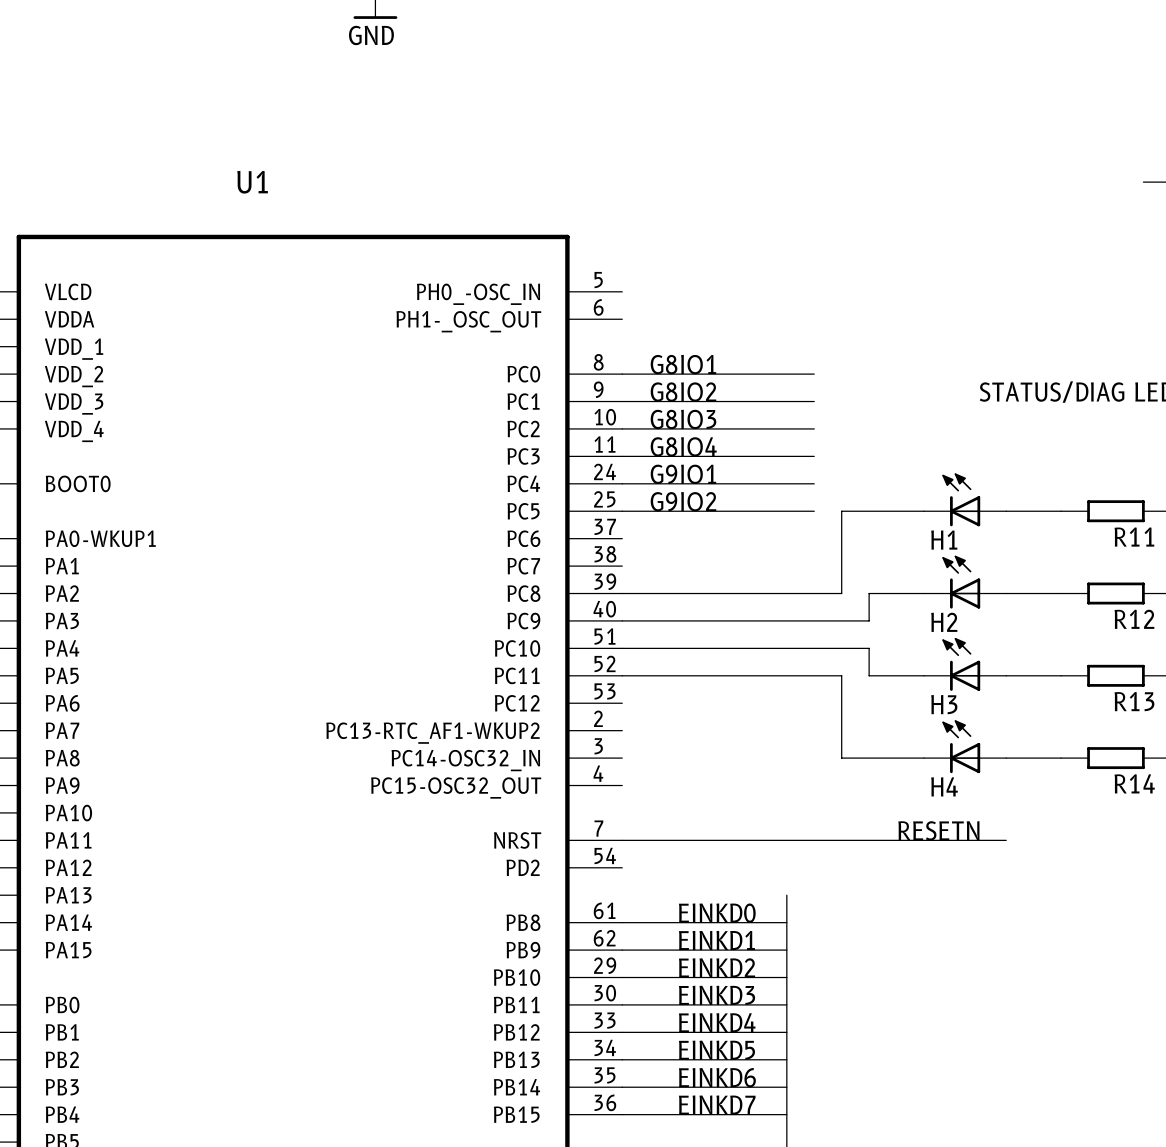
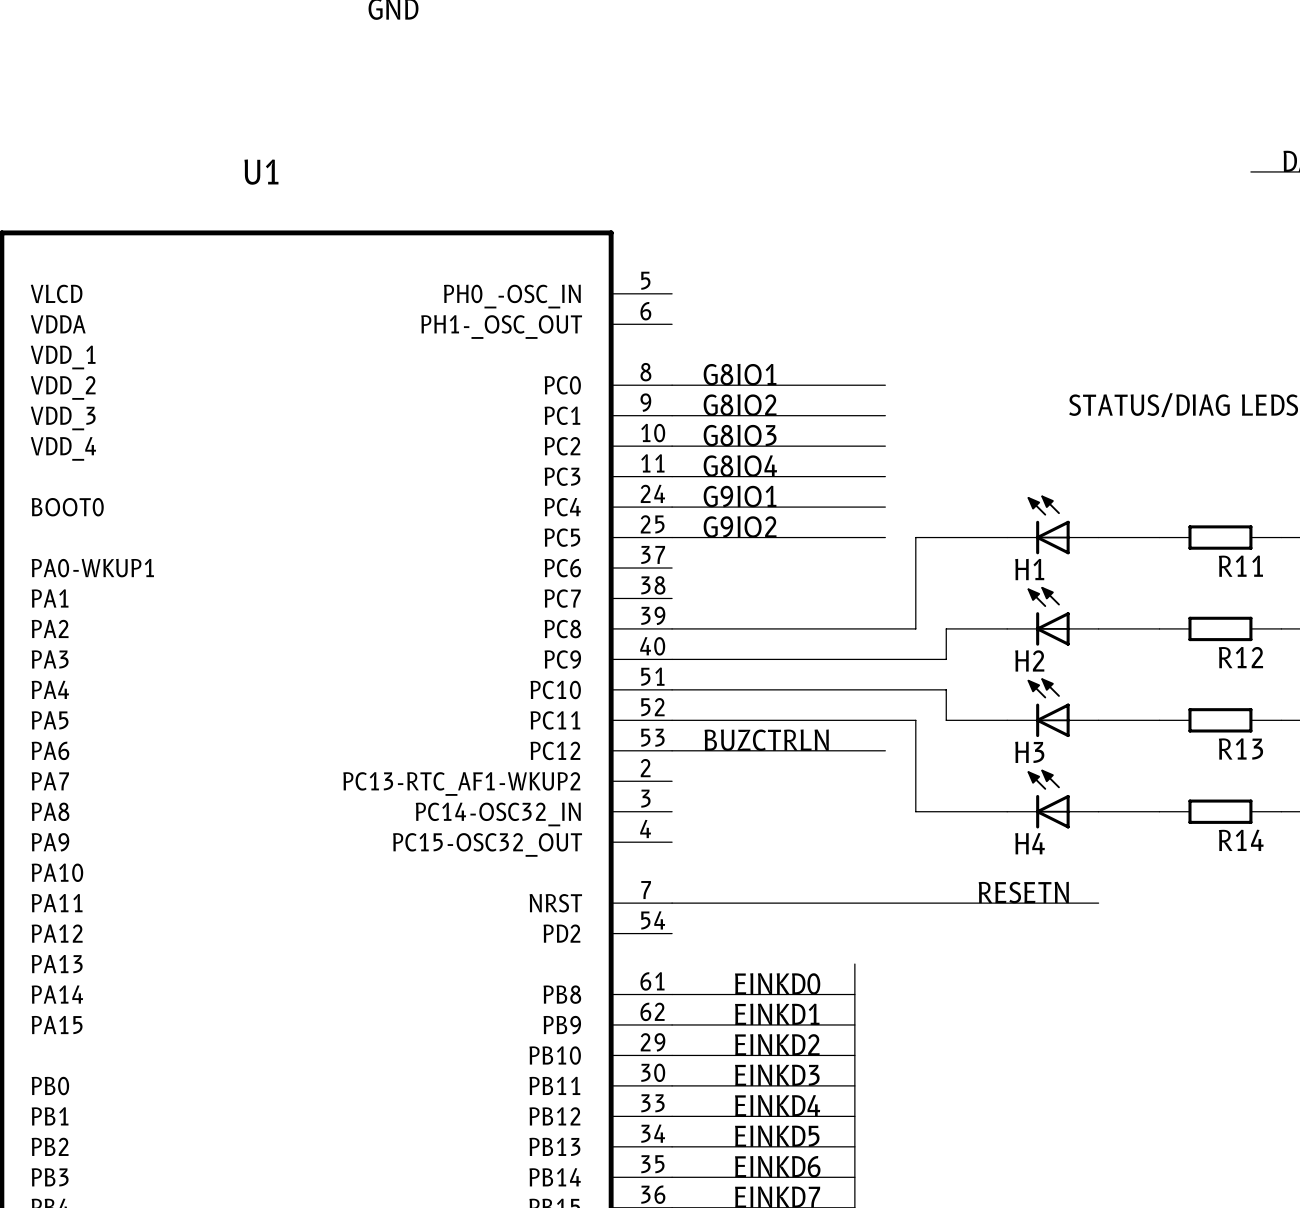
label: none -> BUZCTRLN (766, 740)
wire: none -> (672, 750) (885, 750)

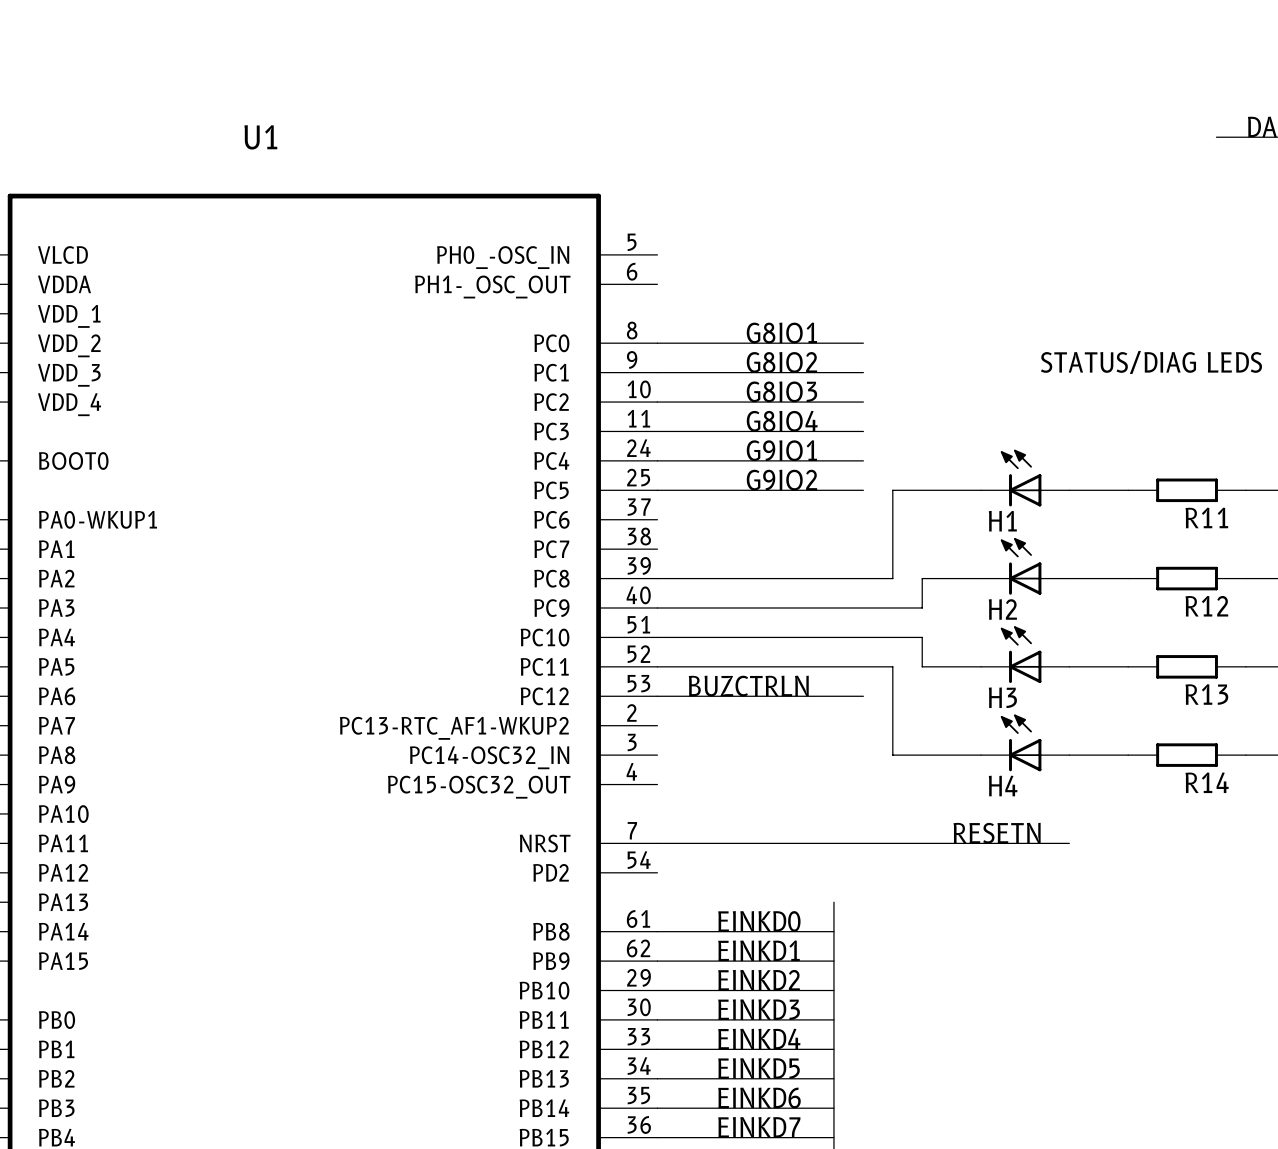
label position: G8IO1 (740, 374) -> G8IO1 (781, 333)
label position: G8IO2 (740, 405) -> G8IO2 (781, 362)
label position: G8IO3 (740, 435) -> G8IO3 (781, 391)
label position: G8IO4 (740, 466) -> G8IO4 (782, 421)
label position: G9IO1 (740, 496) -> G9IO1 (781, 450)
label position: G9IO2 (740, 527) -> G9IO2 (781, 480)

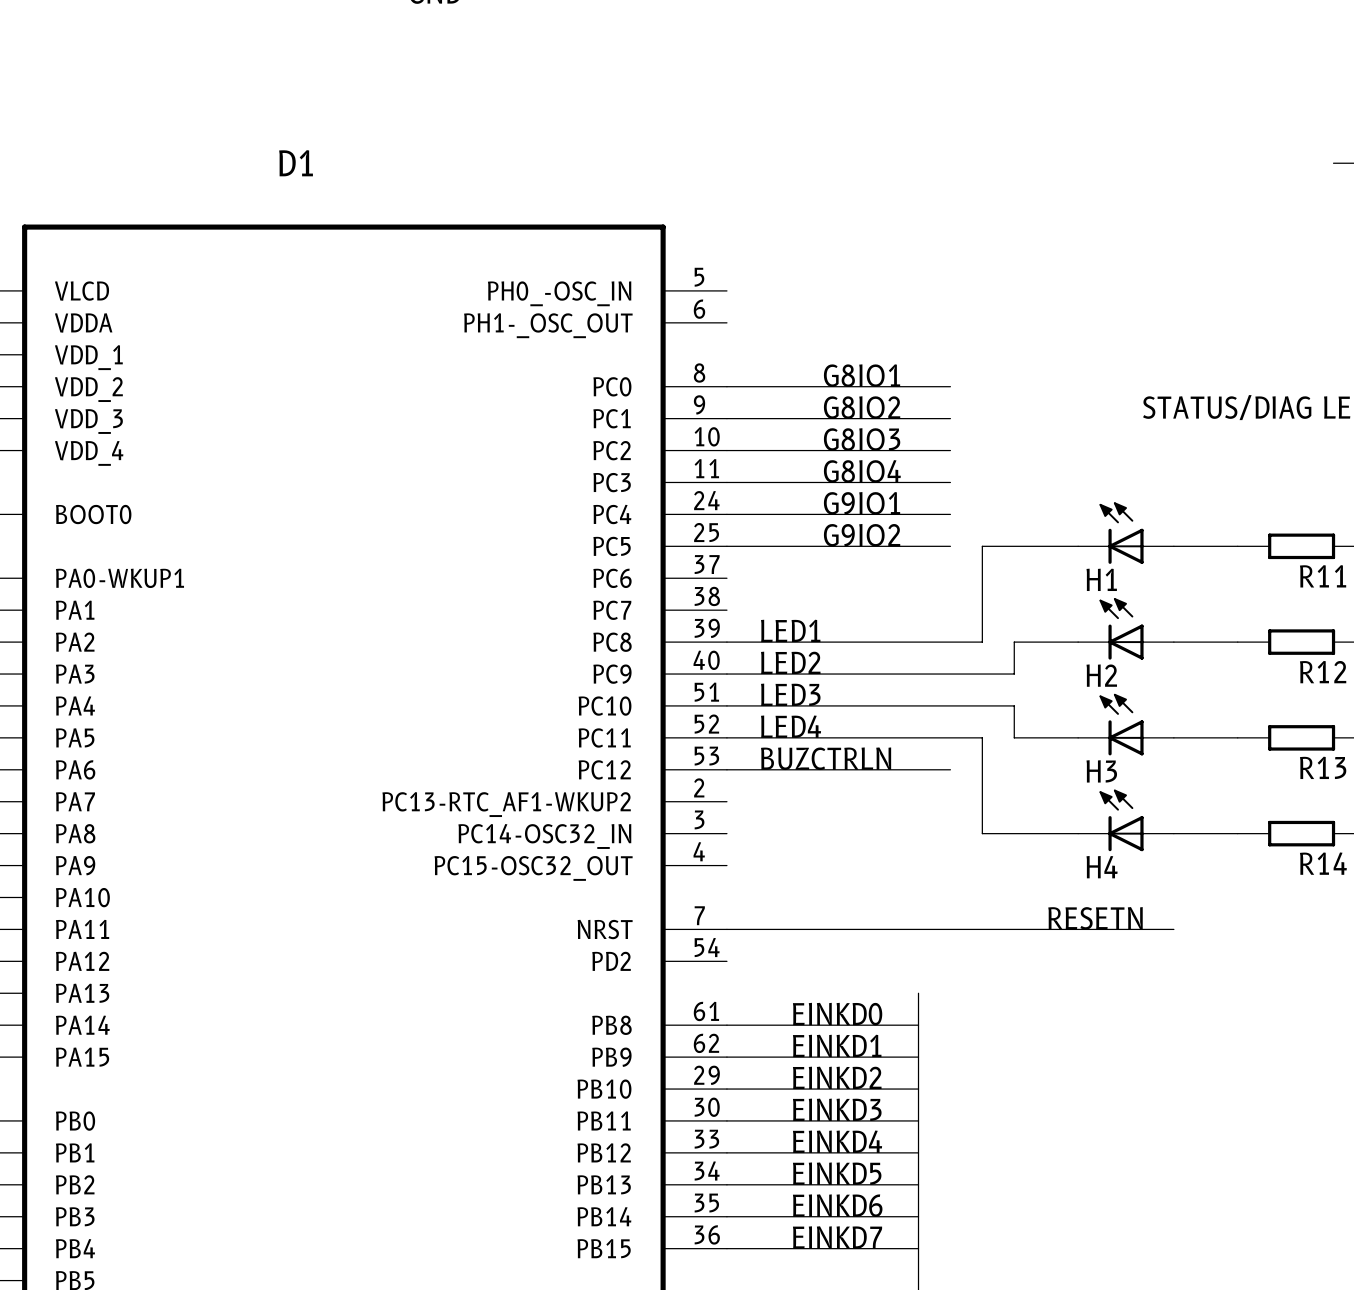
U1 name: U1 (260, 137) -> D1 (296, 163)
label: none -> LED1 (790, 630)
label: none -> LED2 (790, 662)
label: none -> LED3 (790, 694)
label: none -> LED4 (791, 726)

